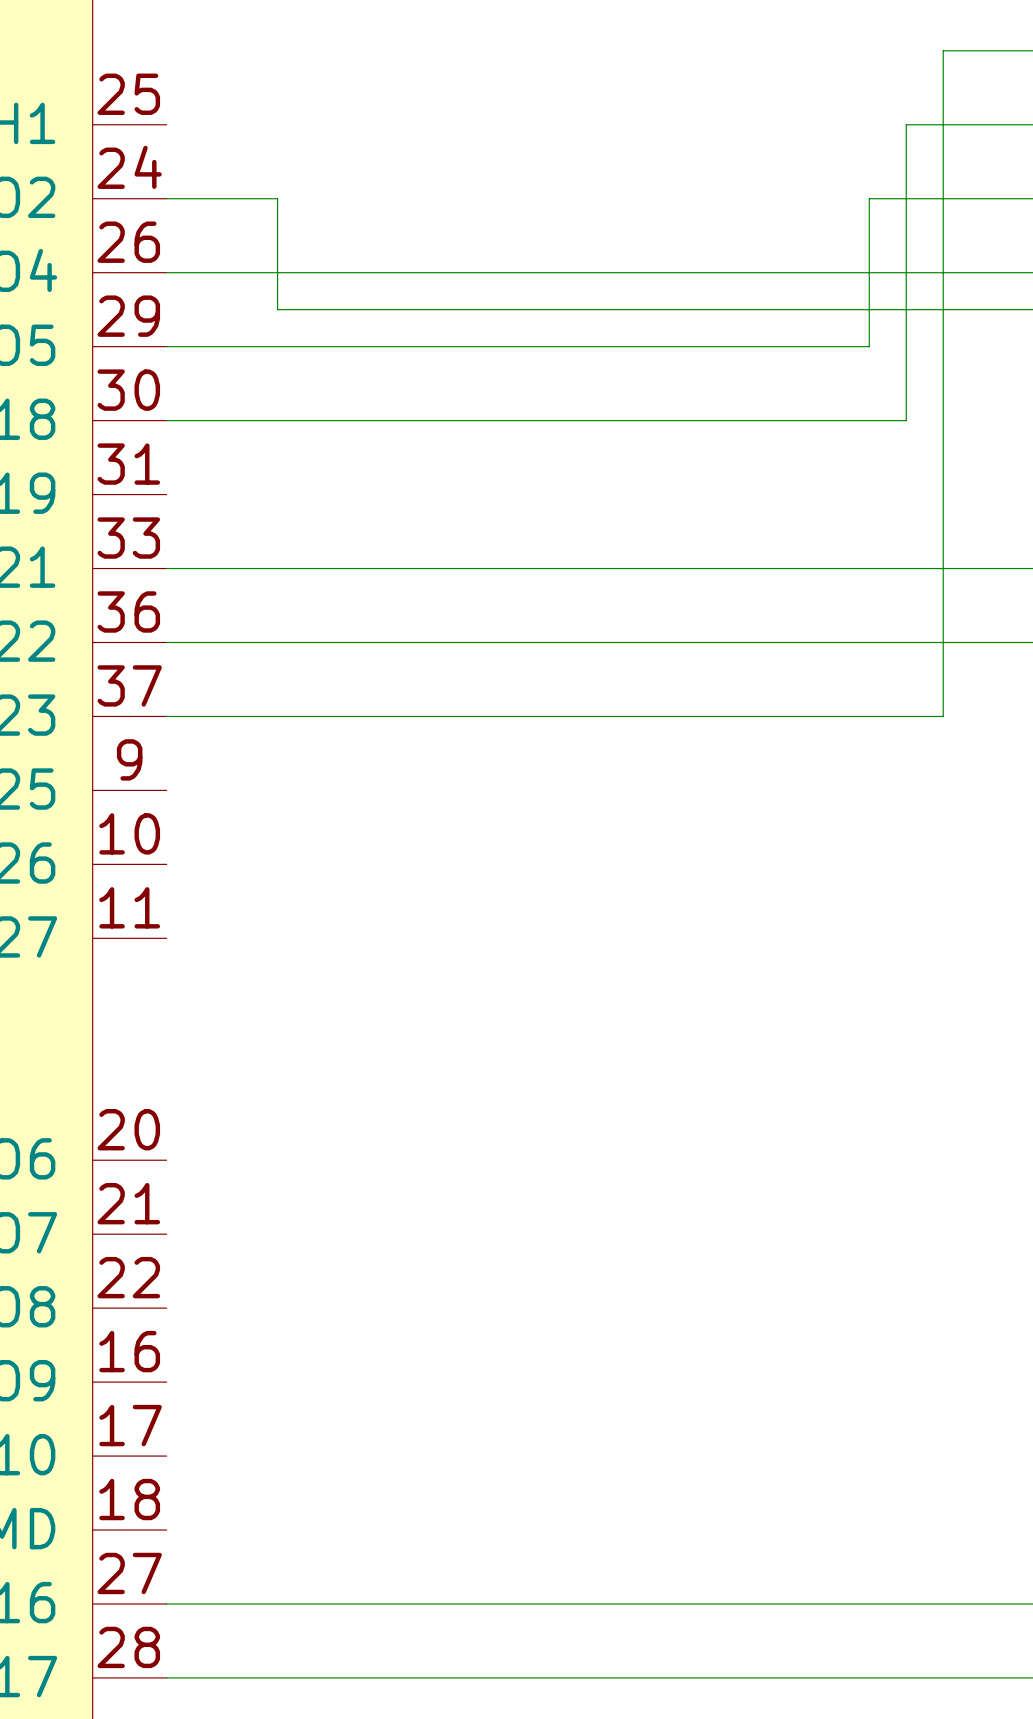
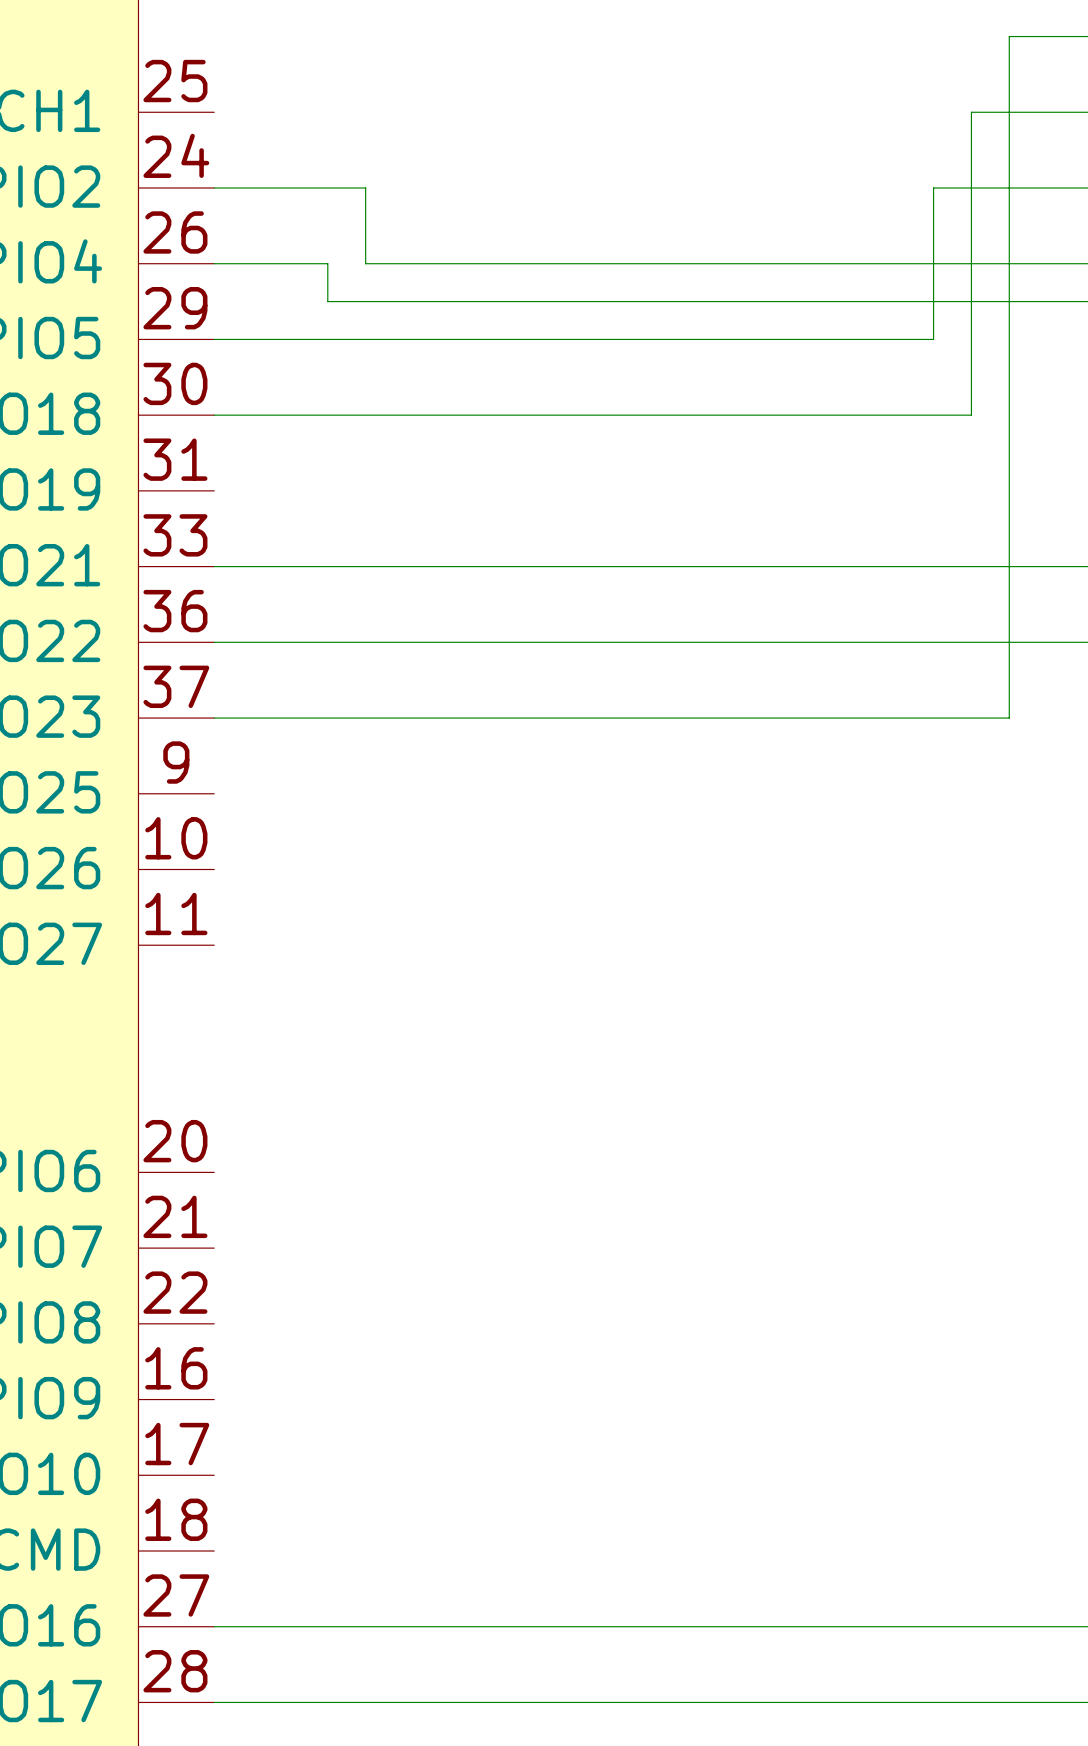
wire: (277, 198) (277, 272) (314, 272) -> (327, 187) (365, 187) (365, 263)

